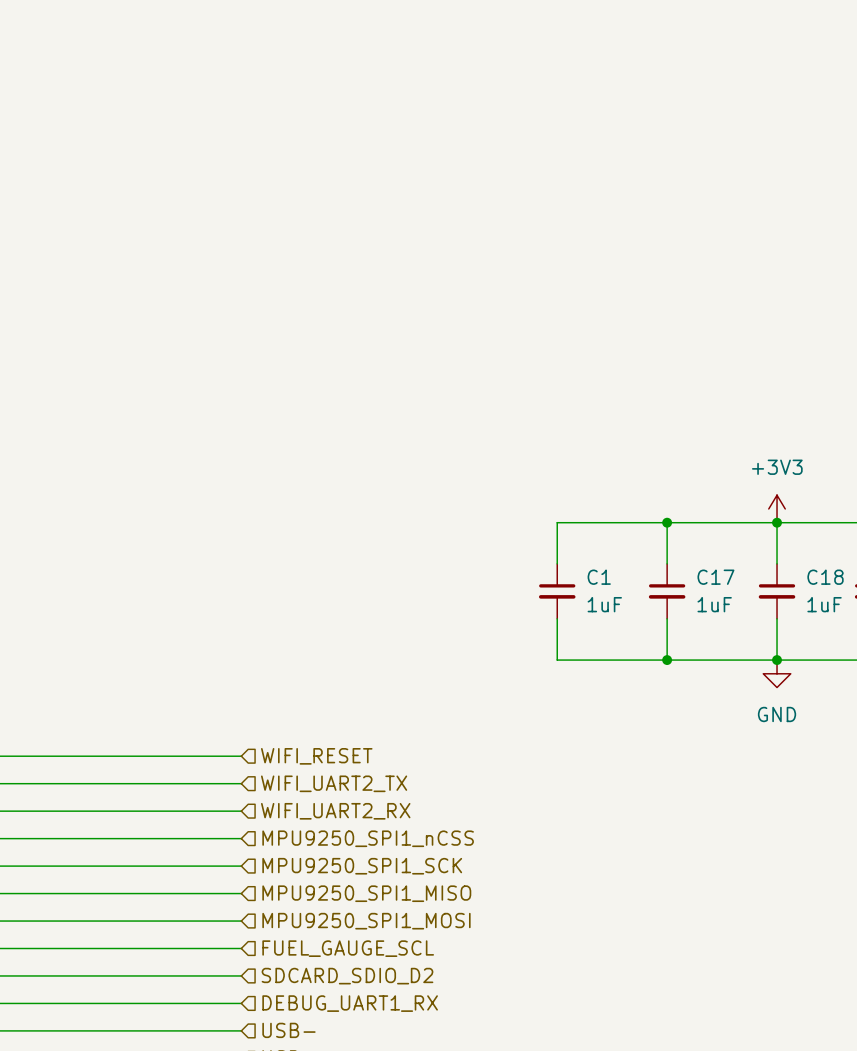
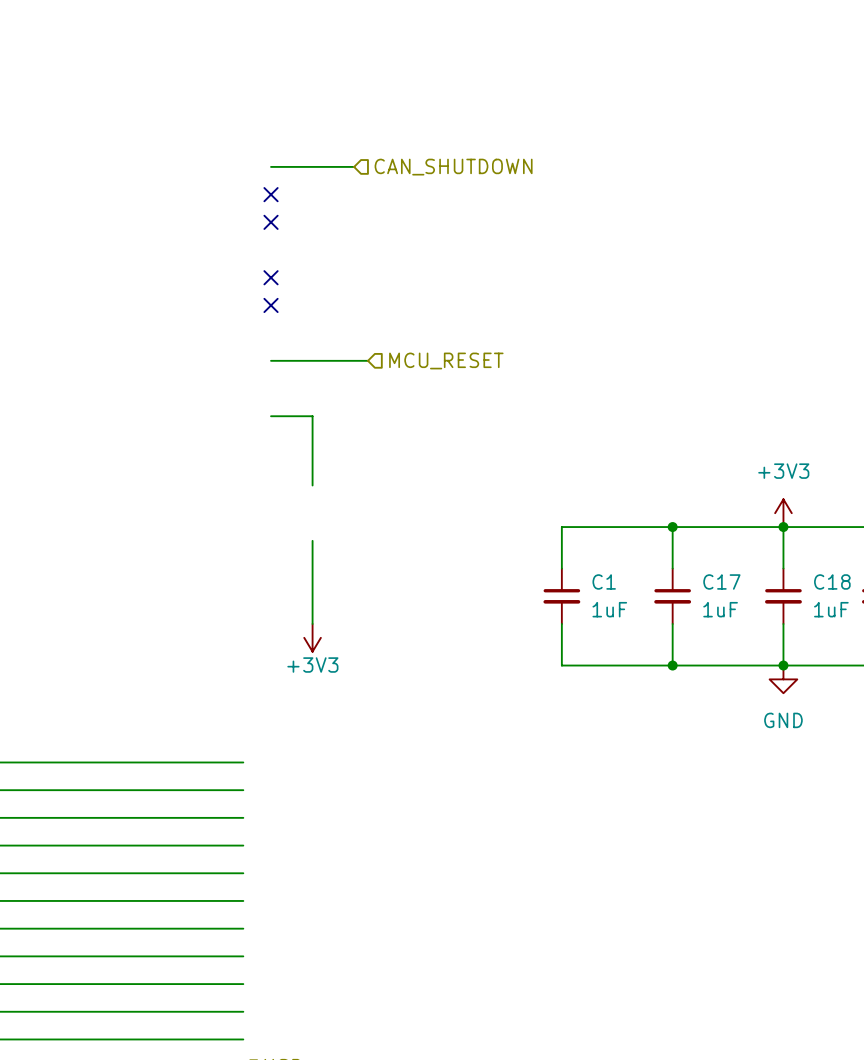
wire: none -> (271, 166) (354, 166)
hierarchical label: none -> CAN_SHUTDOWN (453, 167)
no-connect mark: none -> (271, 194)
no-connect mark: none -> (271, 222)
no-connect mark: none -> (271, 277)
no-connect mark: none -> (271, 305)
wire: none -> (271, 360) (367, 360)
hierarchical label: none -> MCU_RESET (446, 360)
wire: none -> (271, 416) (312, 416) (312, 485)
wire: none -> (312, 540) (312, 623)
power symbol: none -> +3V3 (312, 637)
hierarchical label: WIFI_RESET (316, 756) -> none
hierarchical label: WIFI_UART2_TX (334, 783) -> none
hierarchical label: WIFI_UART2_RX (335, 811) -> none
hierarchical label: MPU9250_SPI1_nCSS (368, 838) -> none
hierarchical label: MPU9250_SPI1_SCK (362, 866) -> none
hierarchical label: MPU9250_SPI1_MISO (366, 893) -> none
hierarchical label: MPU9250_SPI1_MOSI (366, 921) -> none
hierarchical label: FUEL_GAUGE_SCL (348, 948) -> none
hierarchical label: SDCARD_SDIO_D2 (347, 976) -> none
hierarchical label: DEBUG_UART1_RX (350, 1003) -> none
hierarchical label: USB- (288, 1030) -> none

